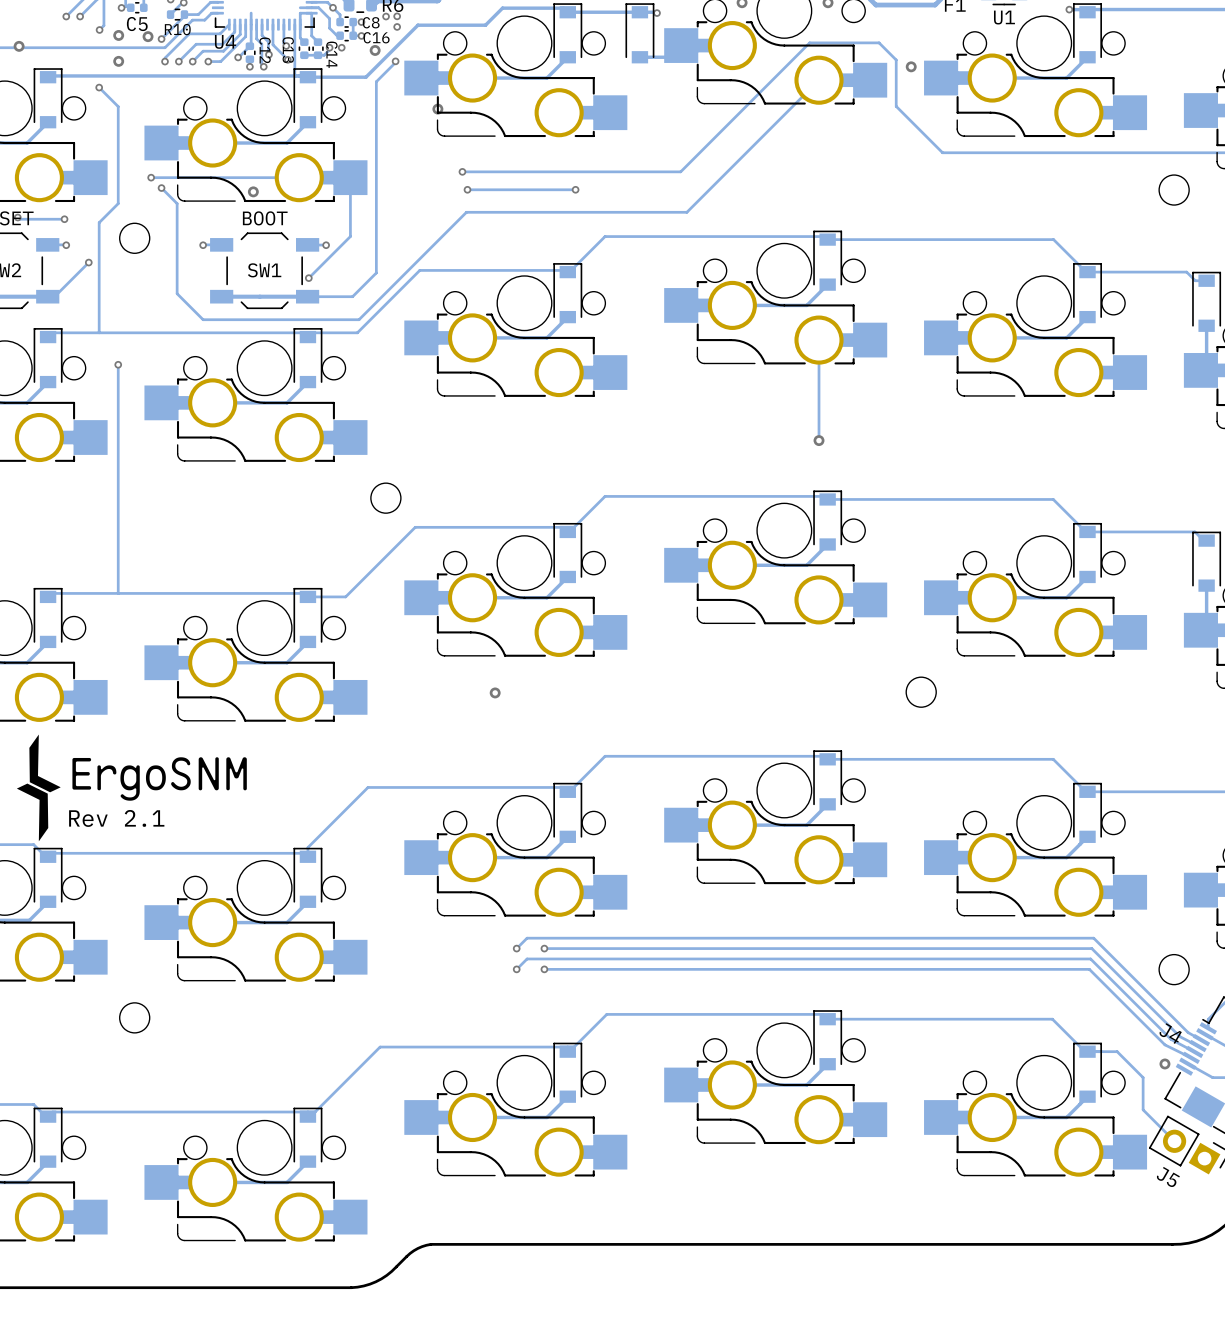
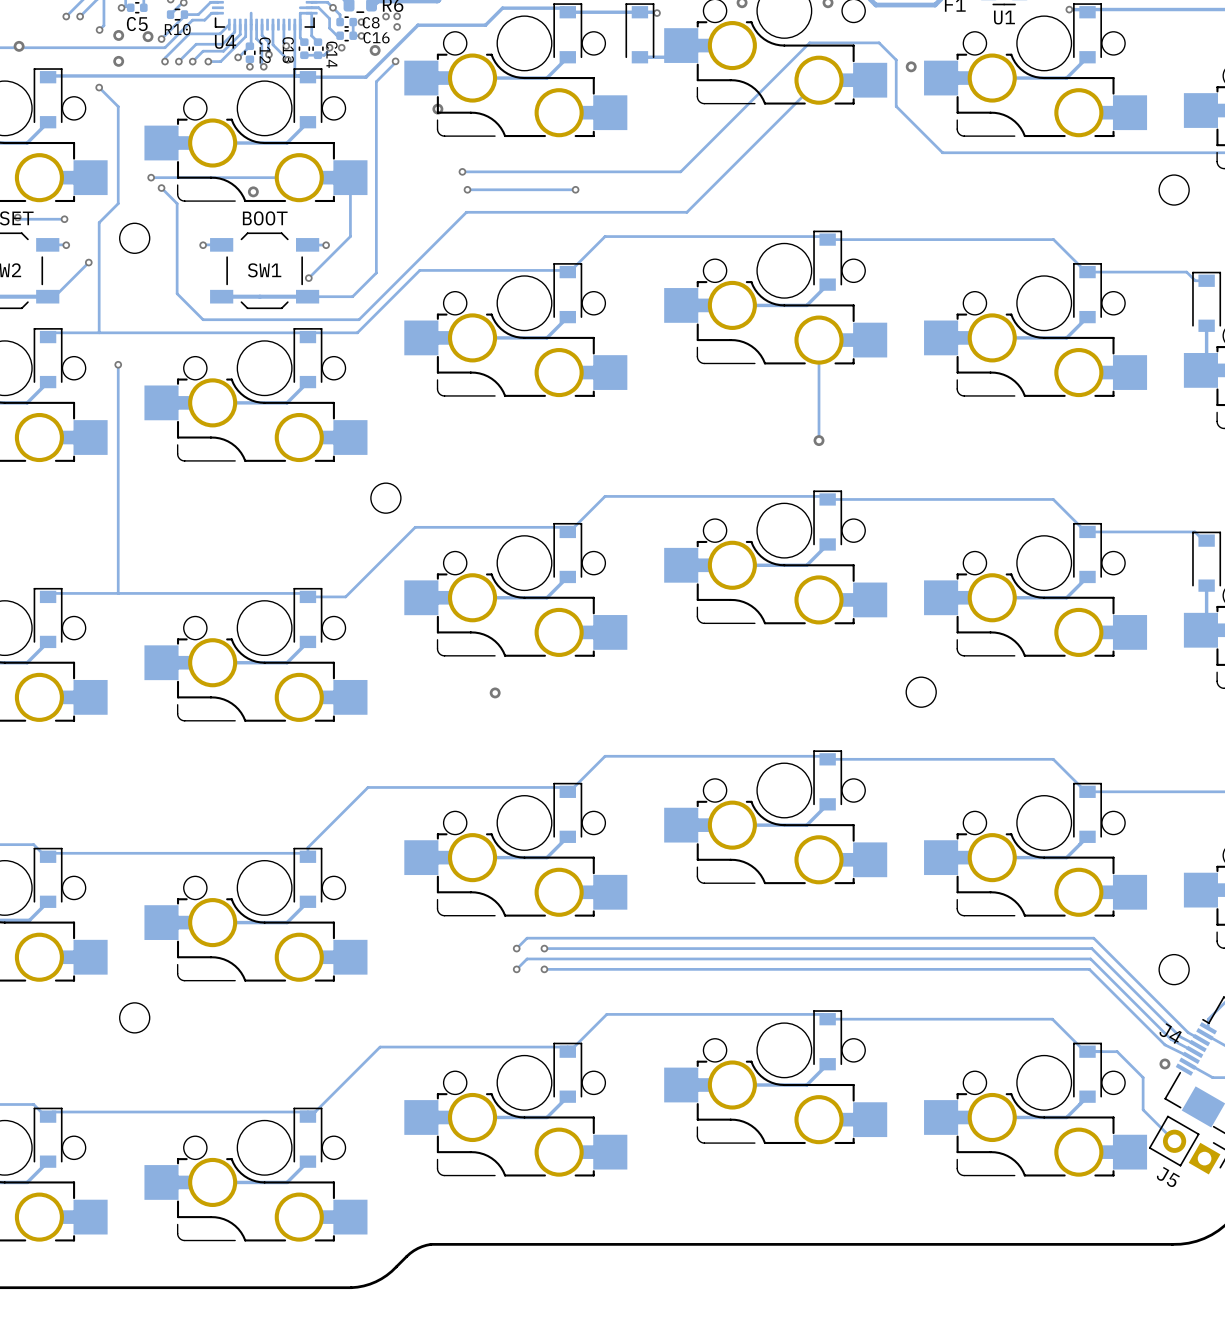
drawing: [16, 734, 247, 842] -> none
text: Rev 2.1 (116, 818) -> none

